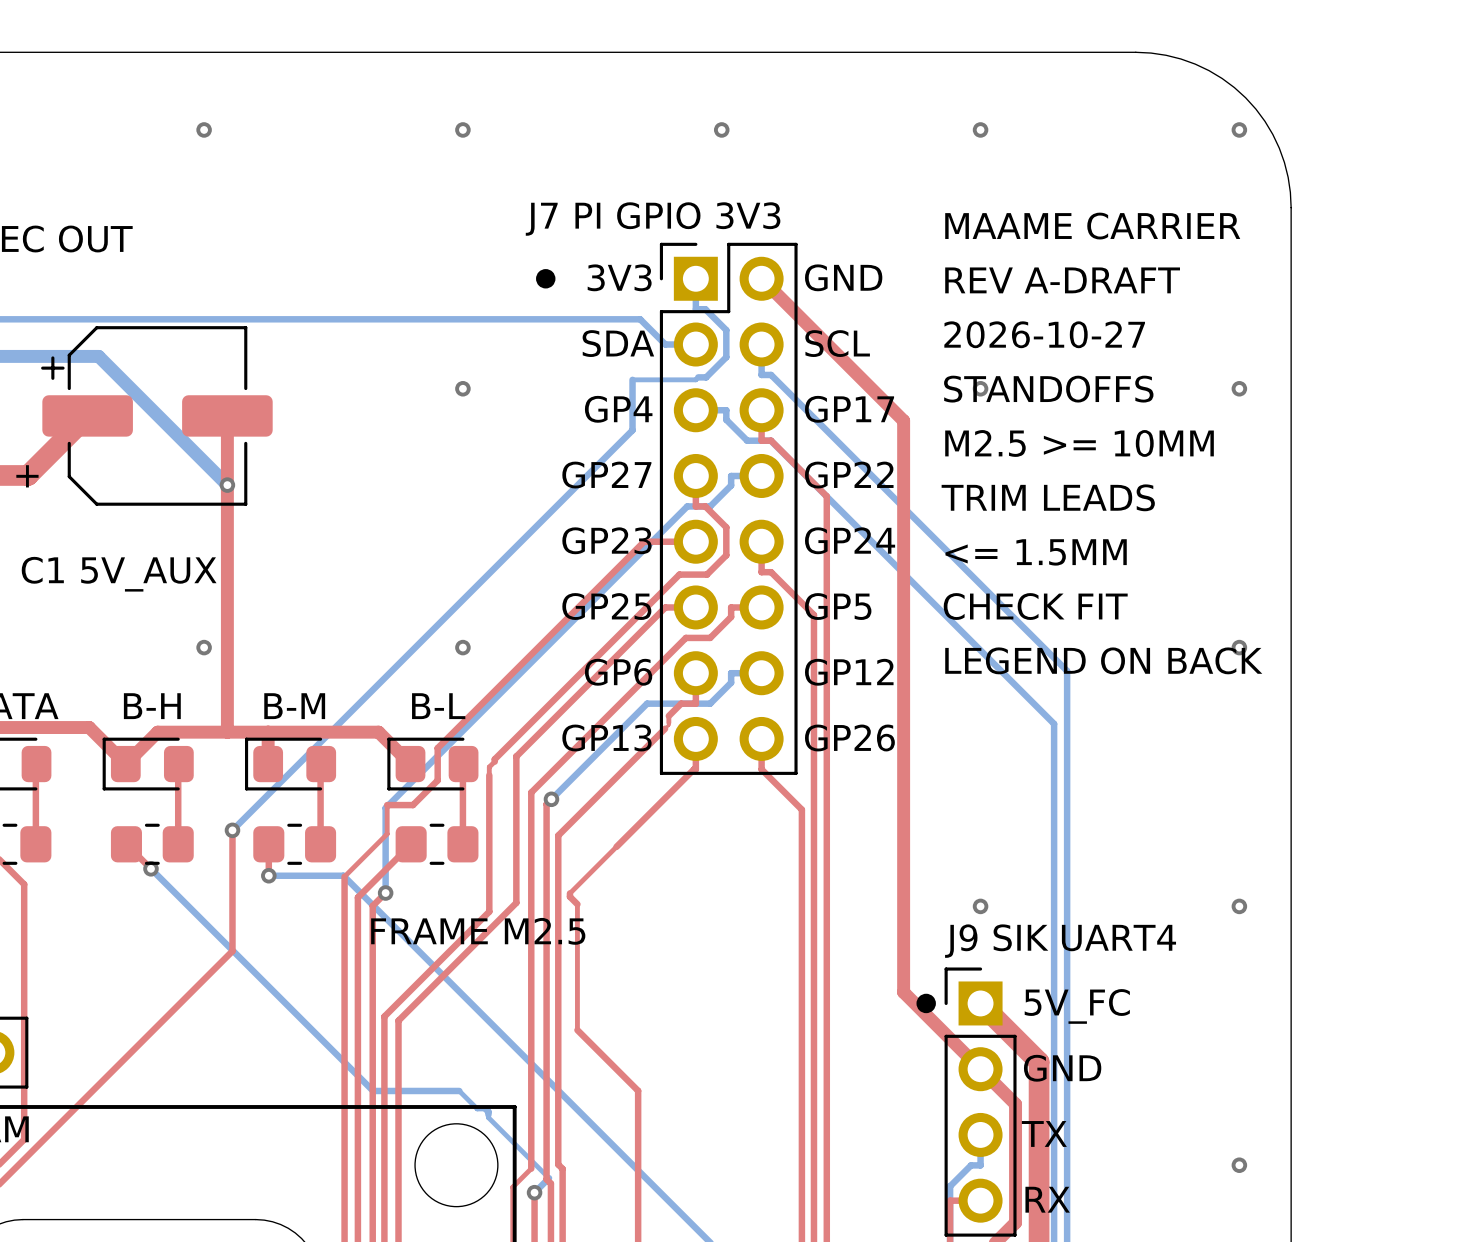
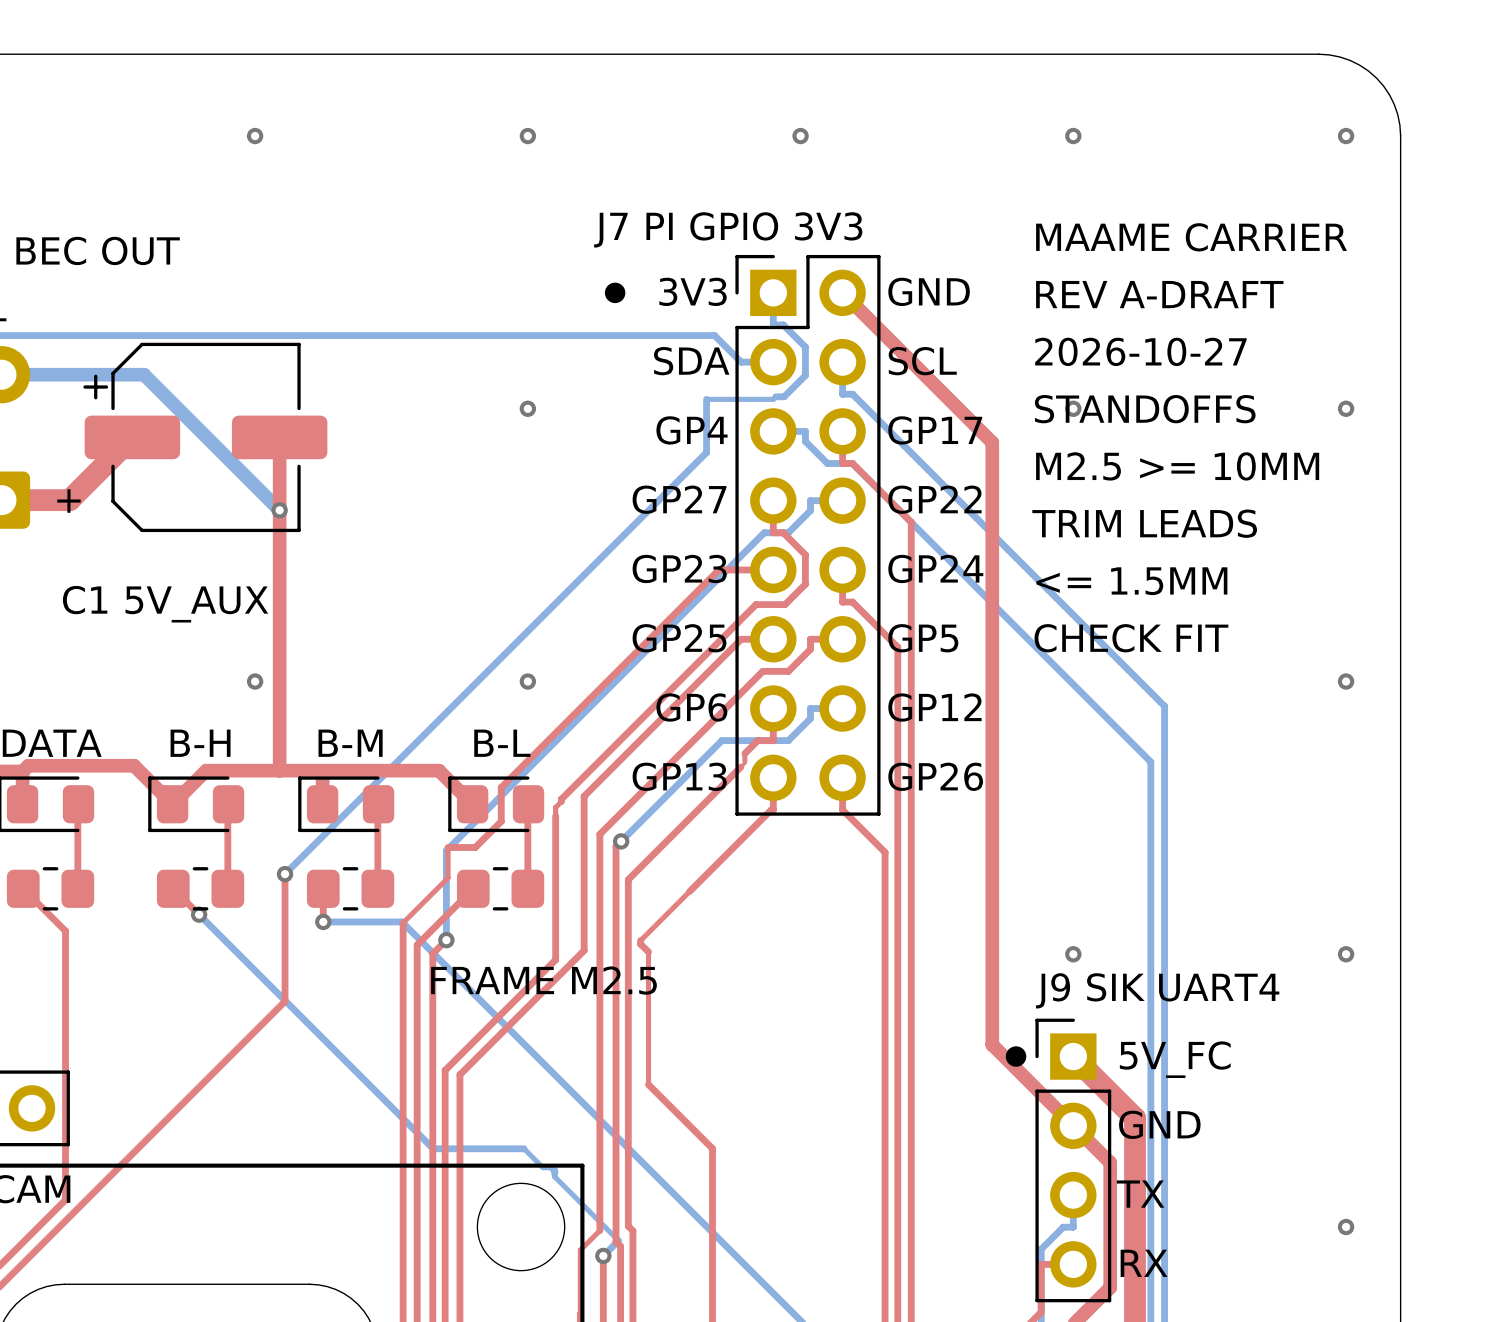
board edge: (1135, 52) (1166, 55) (1195, 64) (1222, 78) (1245, 97) (1264, 121) (1279, 148) (1288, 177) (1291, 207) -> (1236, 54) (1329, 54) (1350, 60) (1376, 78) (1394, 104) (1399, 125) (1400, 217)
text: LEGEND ON BACK (1103, 660) -> none

